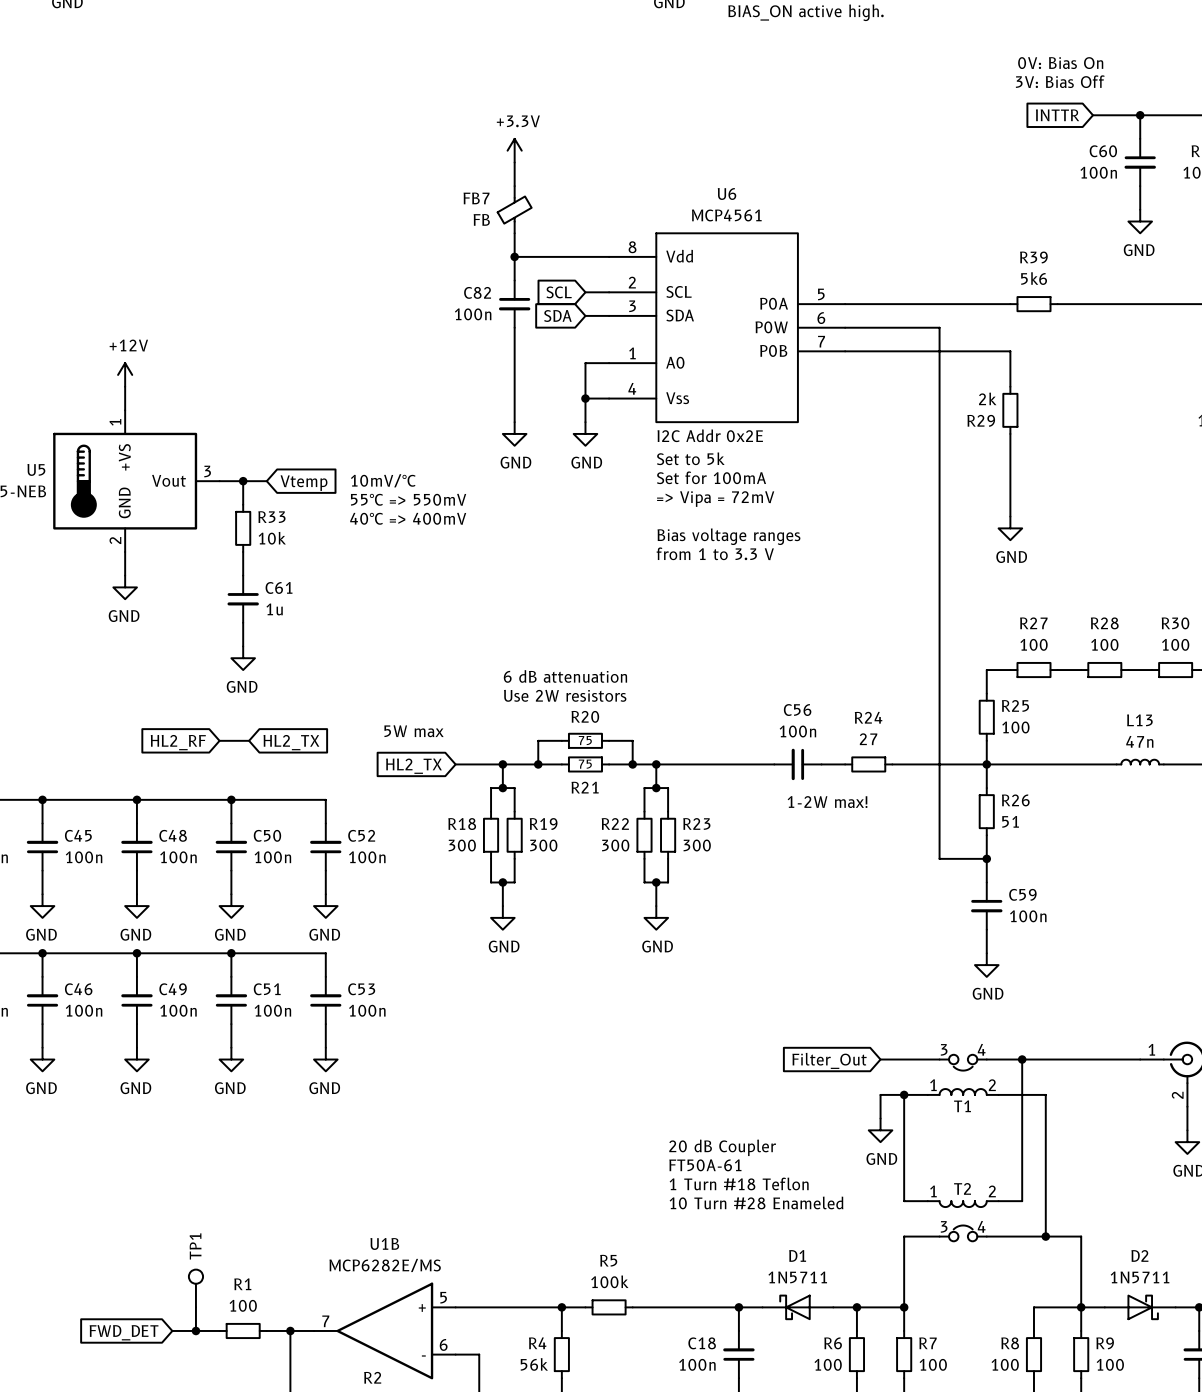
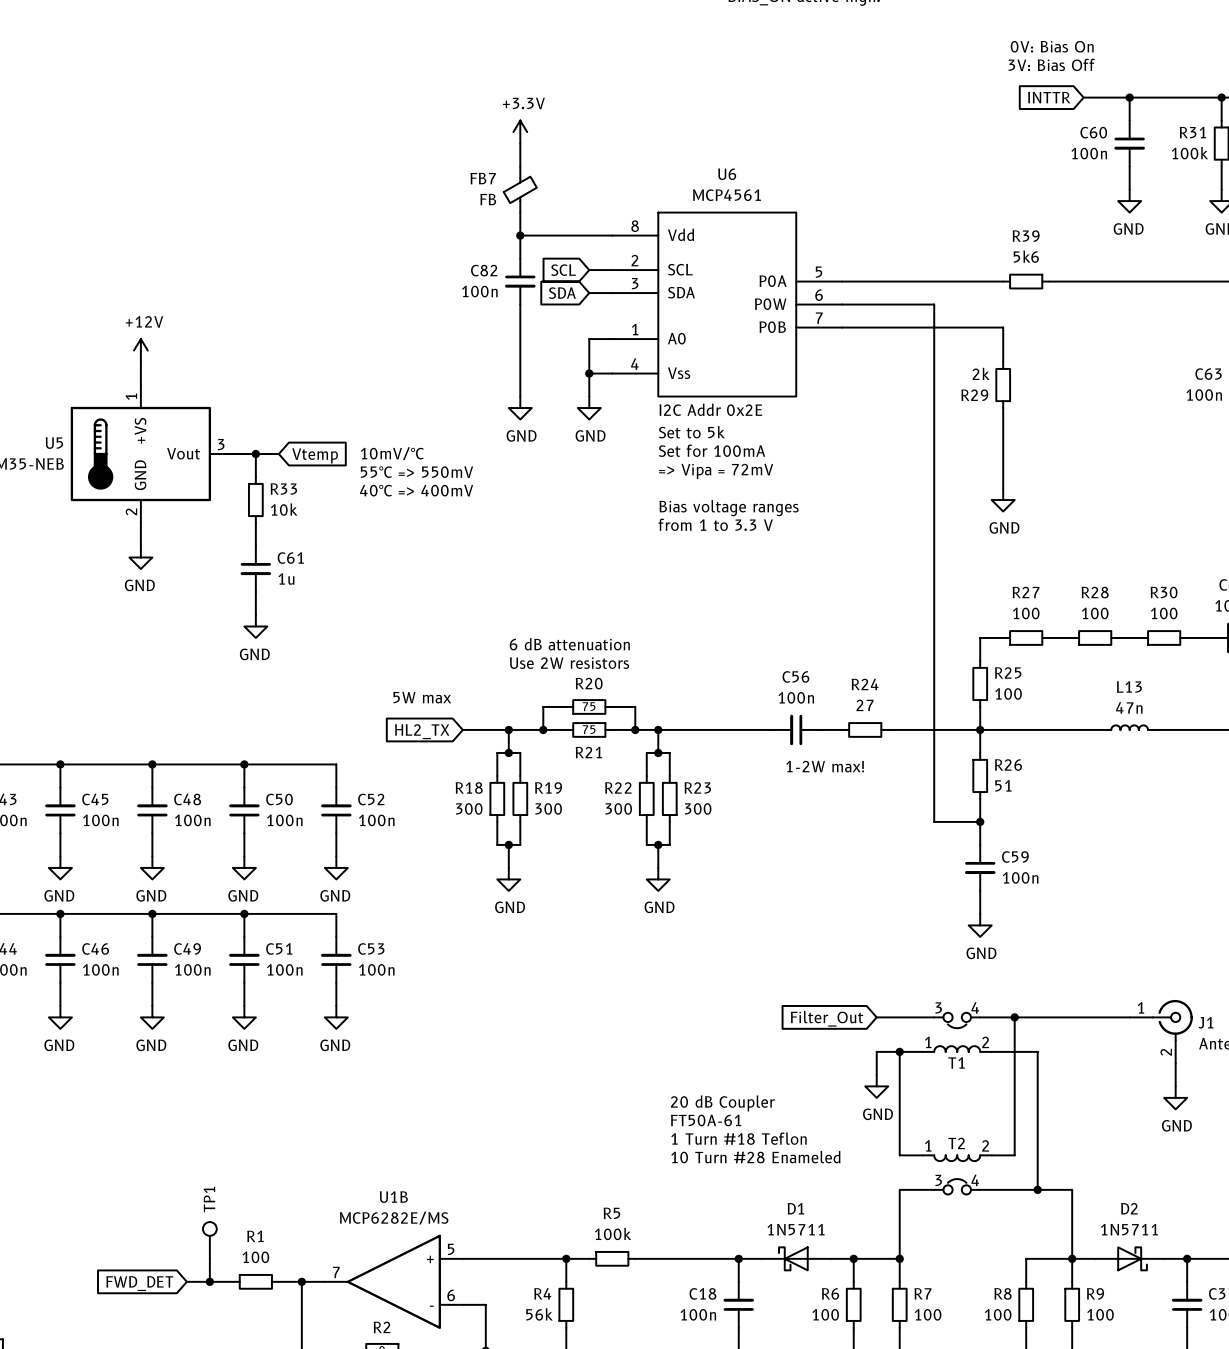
wire: (219, 740) (249, 740) -> none
global label: HL2_RF (178, 742) -> none
global label: HL2_TX (291, 742) -> none

